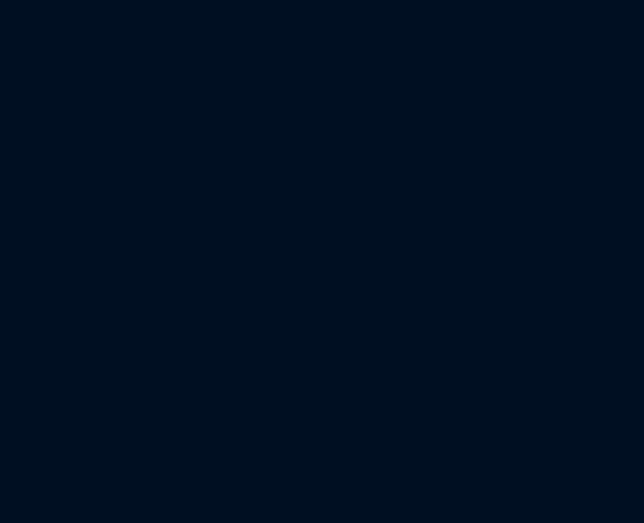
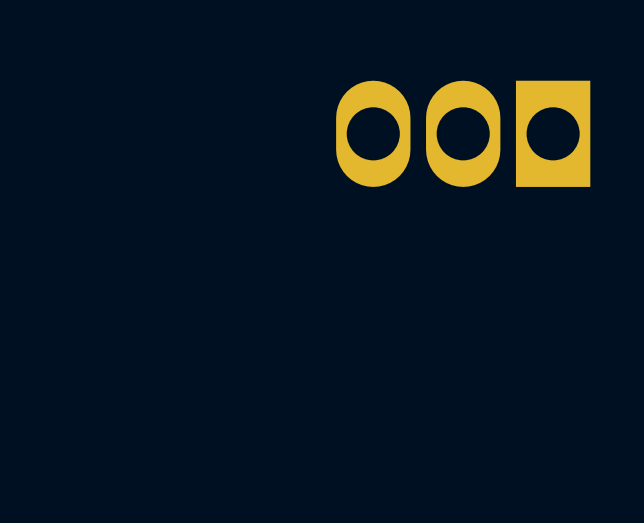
part: none -> (463, 133)

